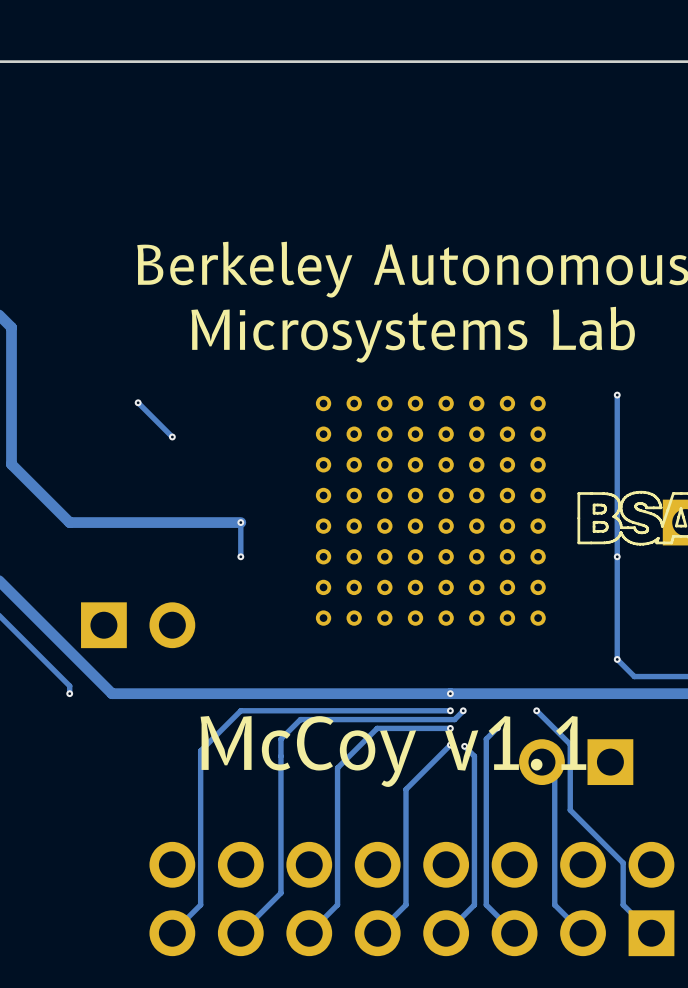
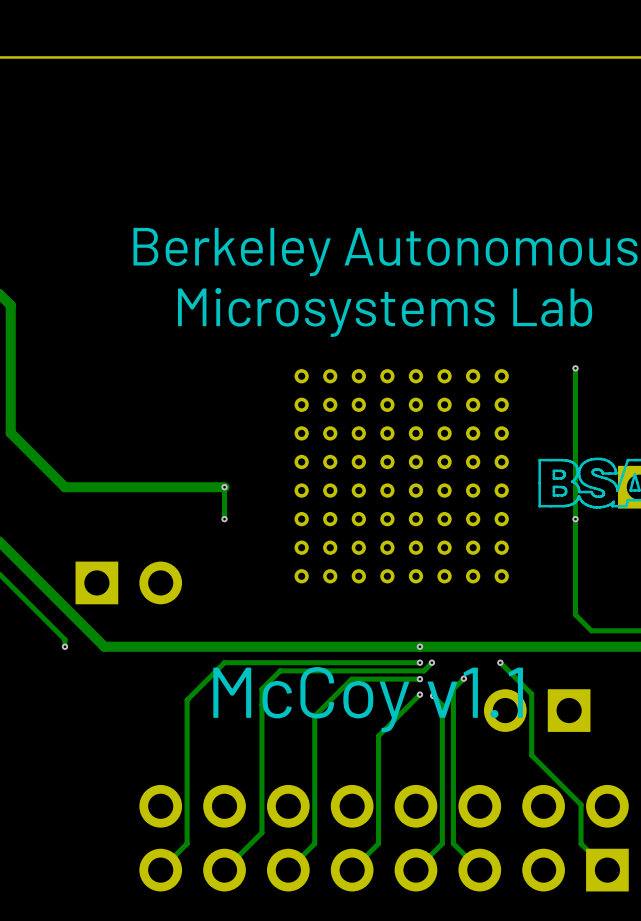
track: (138, 402) (172, 437) -> none
via: (138, 402) -> none
via: (172, 437) -> none
via: (617, 659) -> none
track: (541, 762) (554, 774) (554, 904) (583, 933) -> none

